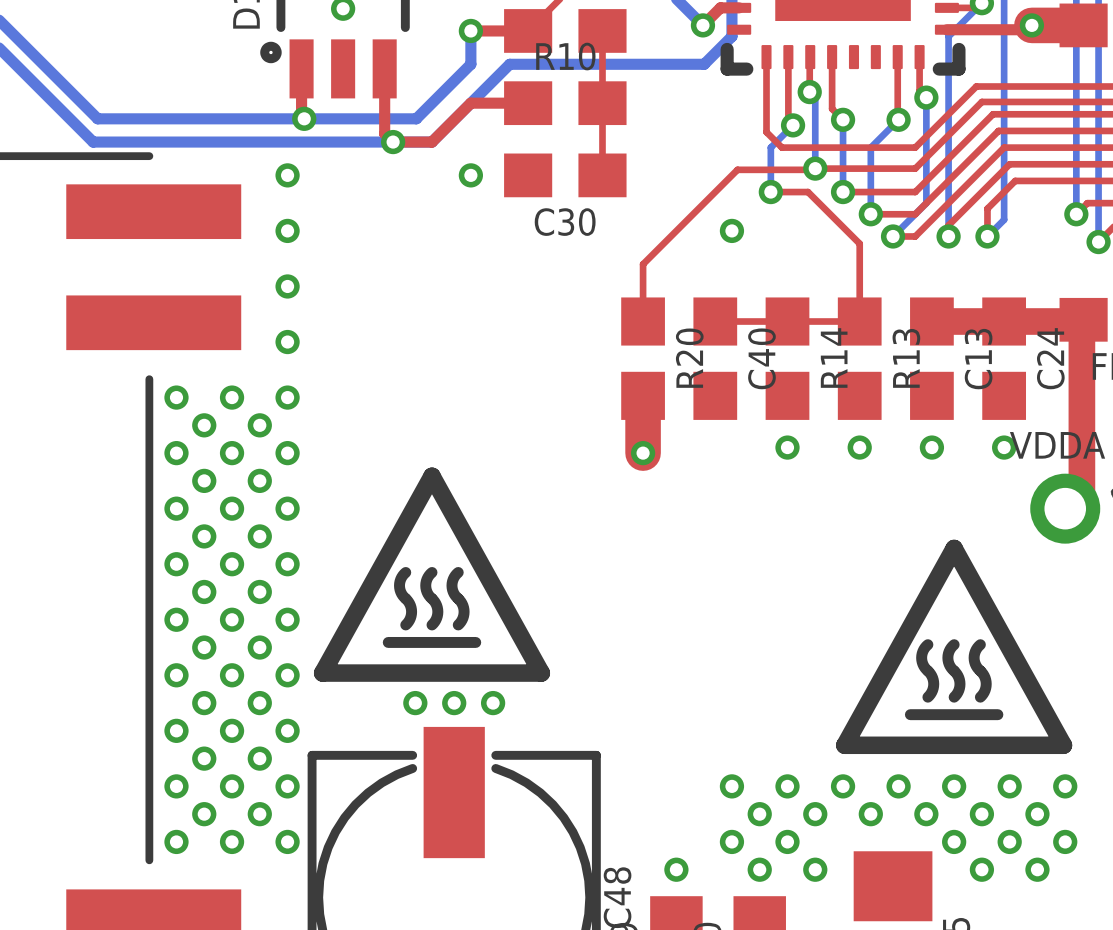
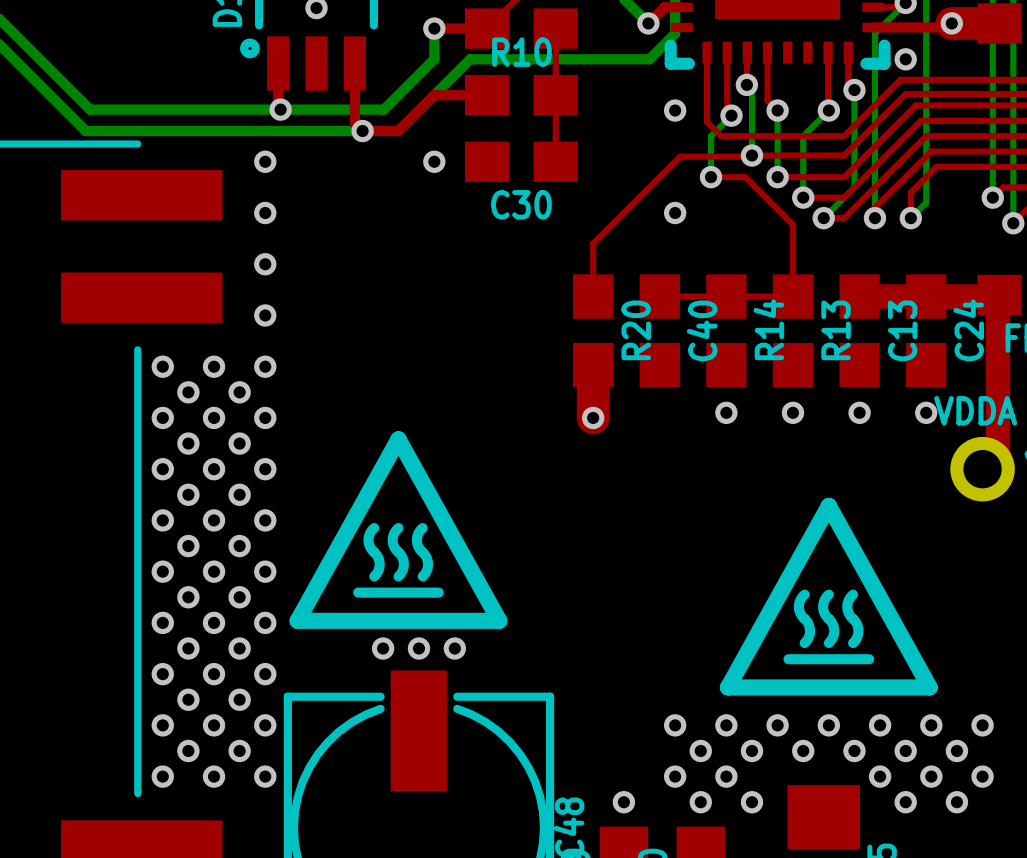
via: none -> (905, 59)
via: none -> (675, 110)
drawing position: (954, 646) -> (828, 596)

